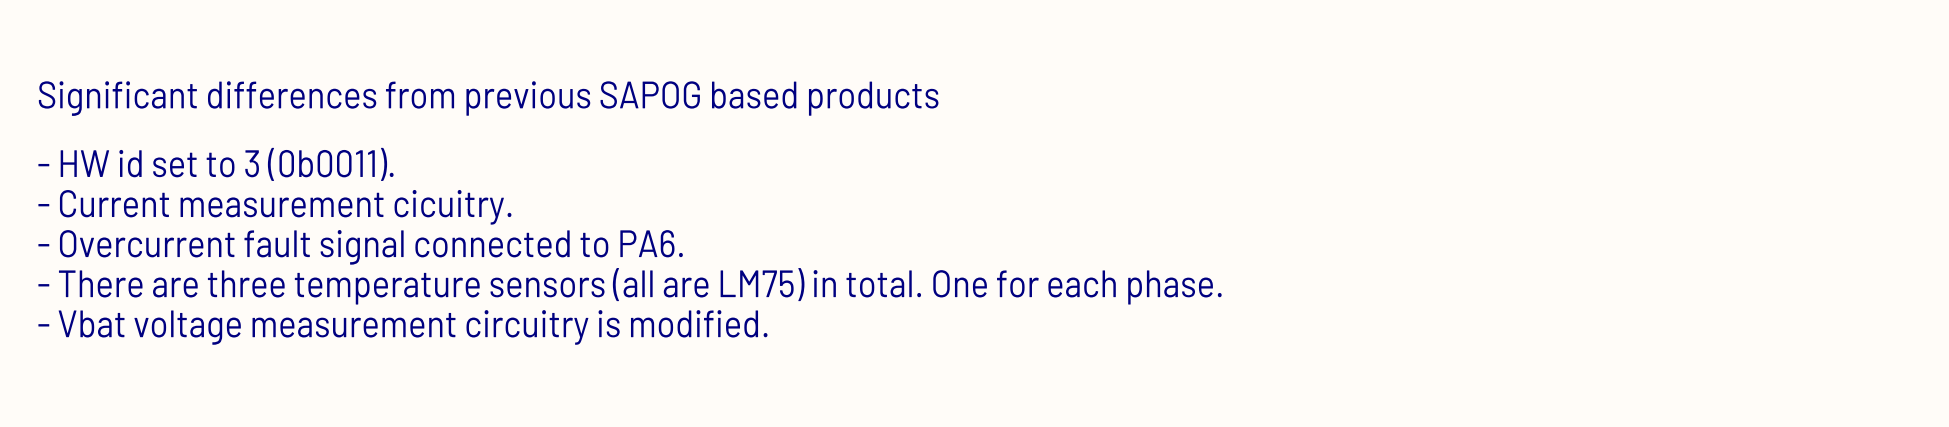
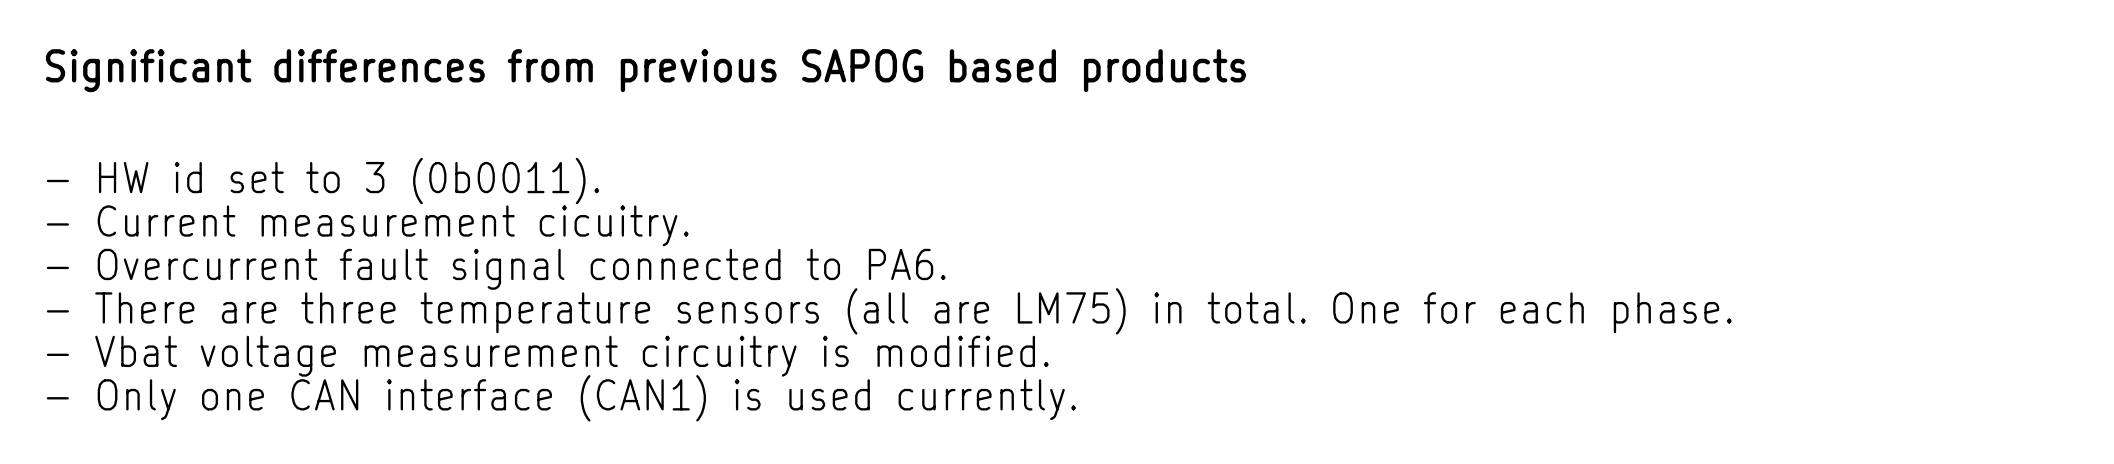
text position: Significant differences from previous SAPOG based products (488, 98) -> Significant differences from previous SAPOG based products (645, 70)
text: none -> - Only one CAN interface (CAN1) is used currently. (561, 398)

